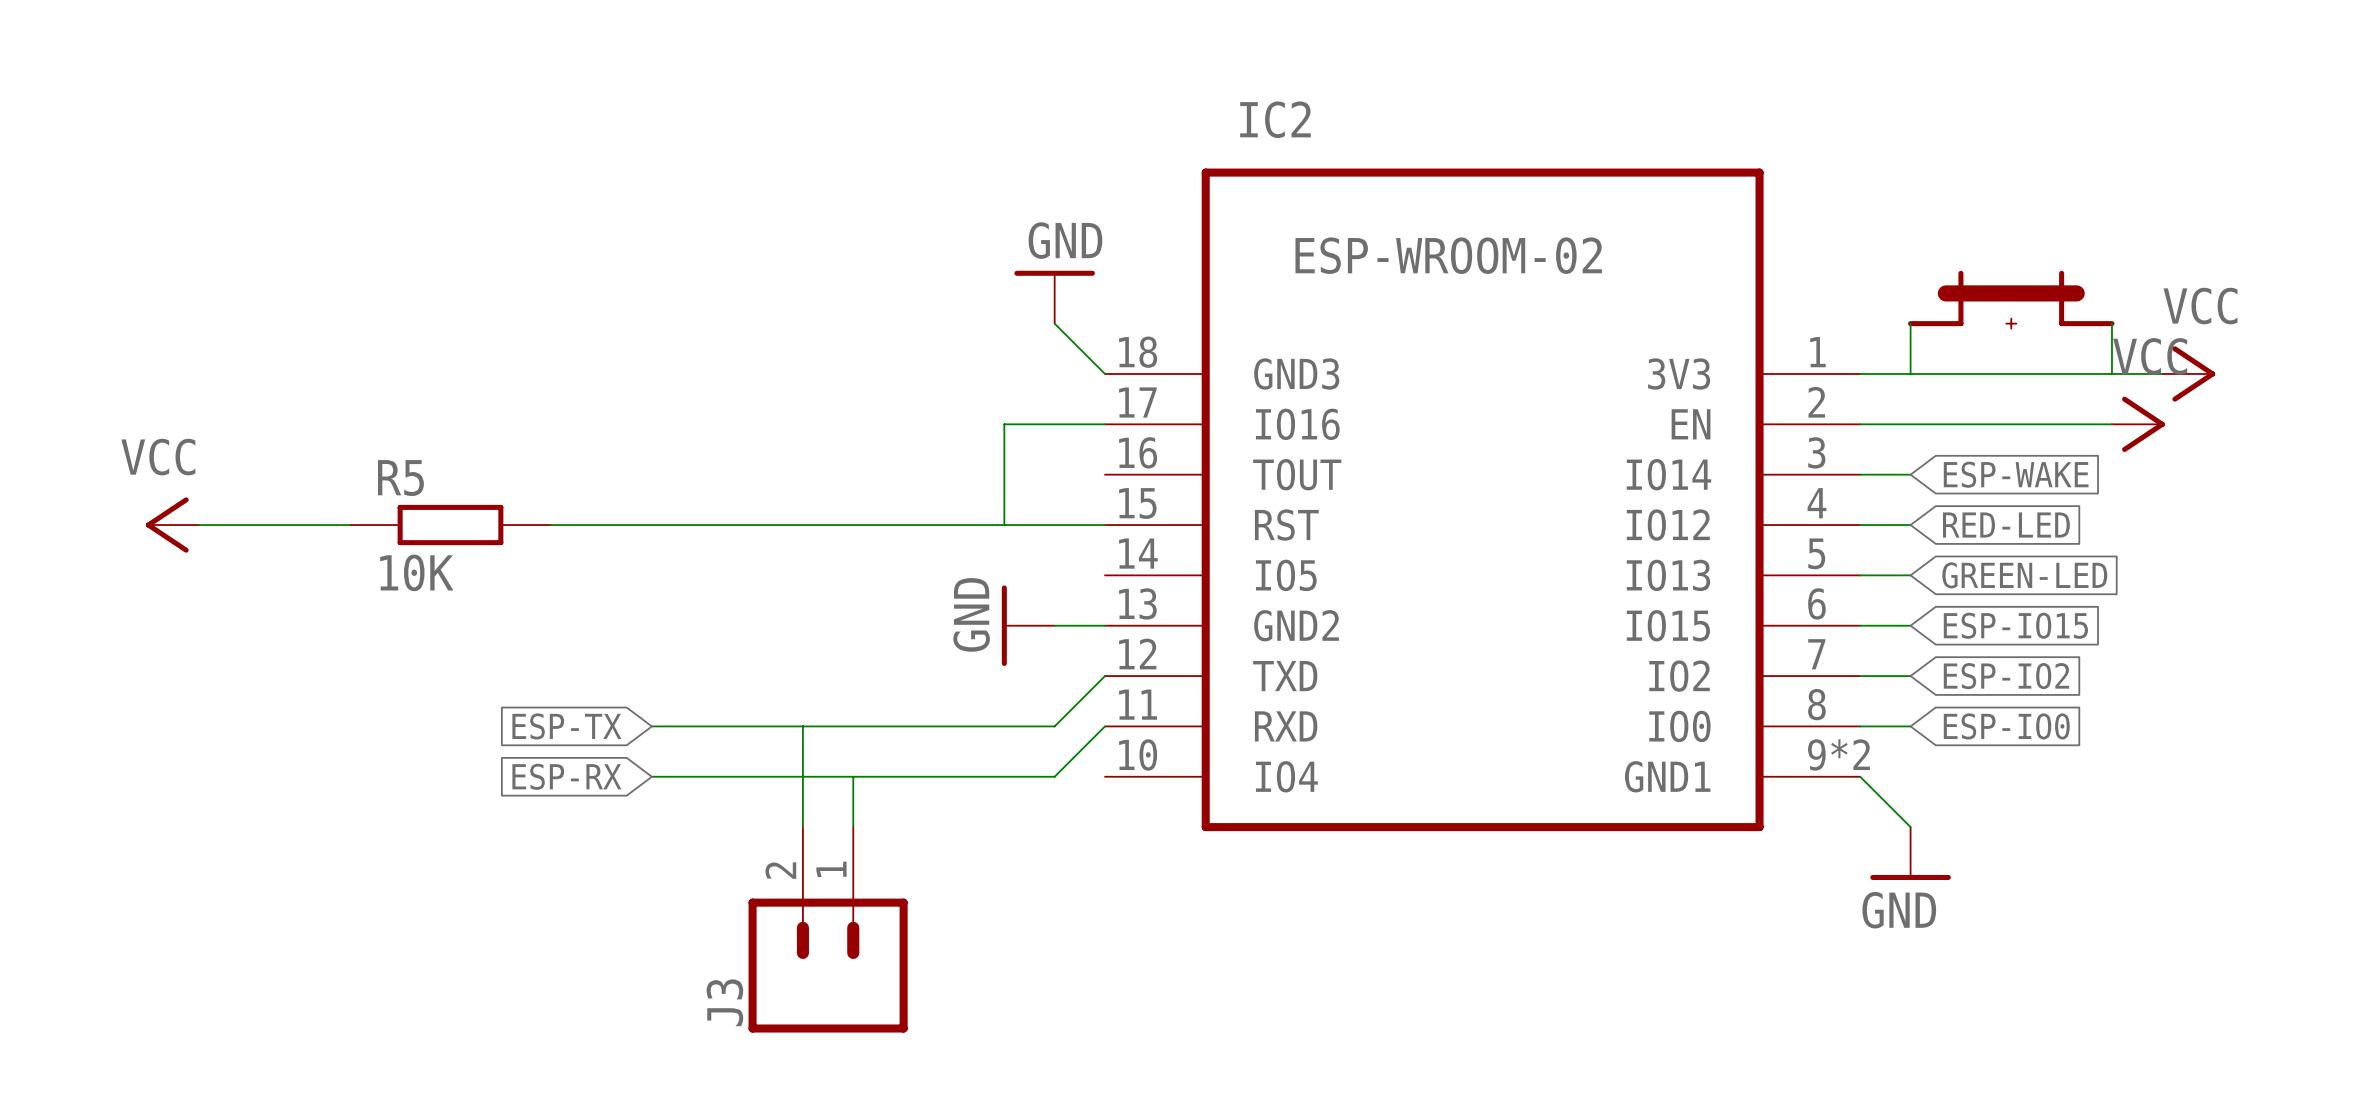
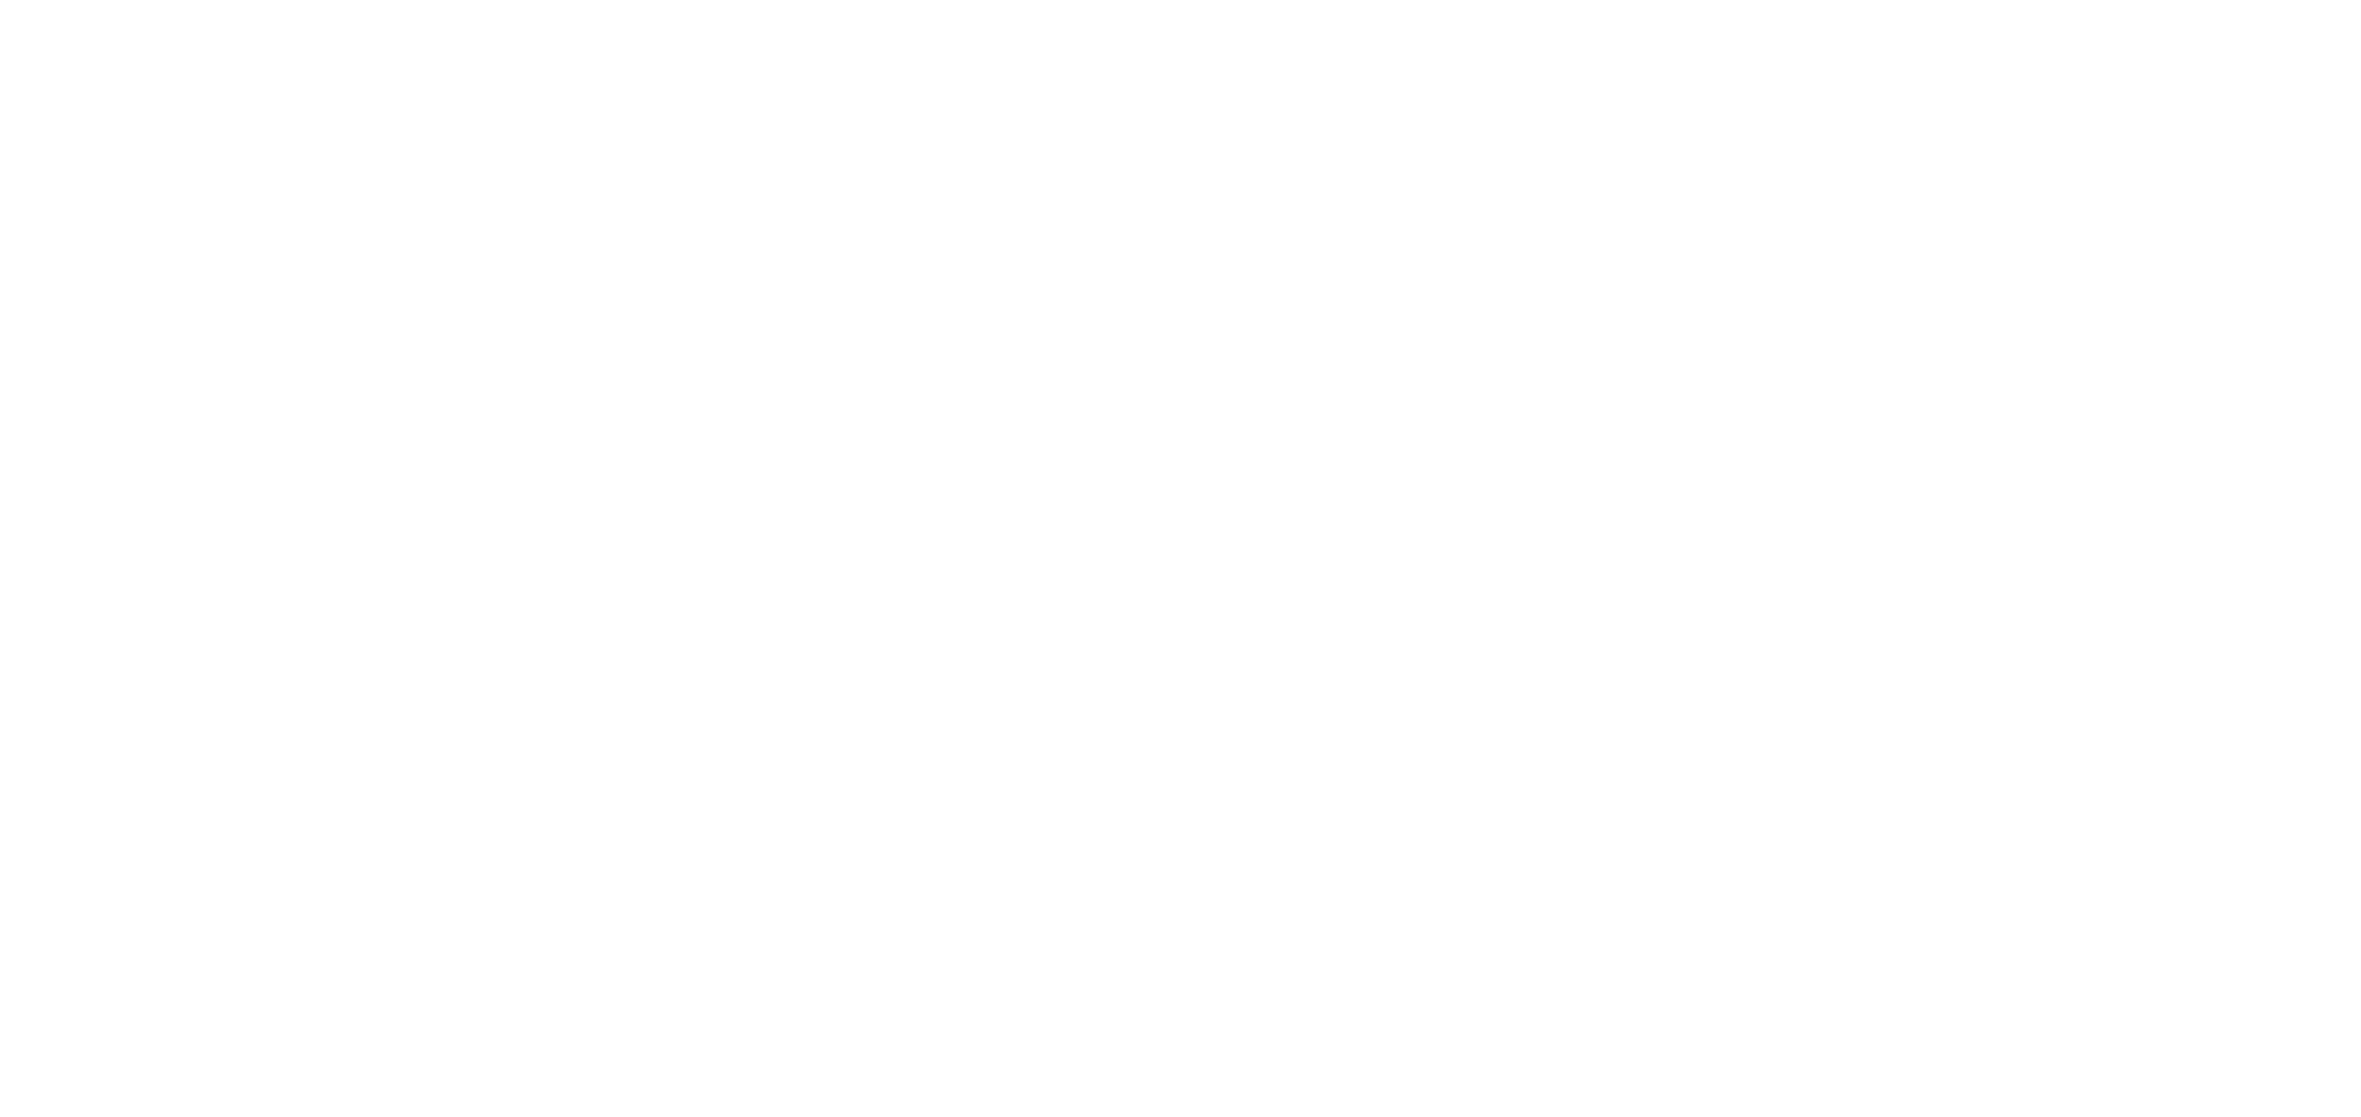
power symbol: GND (1054, 297) -> none
part: (2011, 300) -> none
wire: (1054, 323) (1105, 373) -> none
wire: (1910, 323) (1910, 373) -> none
wire: (2111, 323) (2111, 373) -> none
wire: (1860, 373) (2162, 373) -> none
power symbol: VCC (2188, 373) -> none
wire: (1105, 424) (1004, 424) (1004, 525) -> none
wire: (1860, 424) (2111, 424) -> none
power symbol: VCC (2138, 424) -> none
wire: (1860, 474) (1910, 474) -> none
global label: ESP-WAKE (2016, 474) -> none
IC2: ESP-WROOM-02 (1482, 499) -> none
power symbol: VCC (172, 525) -> none
wire: (198, 525) (349, 525) -> none
R5: 10K (450, 525) -> none
wire: (551, 525) (1105, 525) -> none
wire: (1860, 525) (1910, 525) -> none
global label: RED-LED (2006, 525) -> none
wire: (1860, 575) (1910, 575) -> none
global label: GREEN-LED (2024, 575) -> none
power symbol: GND (1028, 625) -> none
wire: (1054, 625) (1105, 625) -> none
wire: (1860, 625) (1910, 625) -> none
global label: ESP-IO15 (2015, 625) -> none
wire: (1105, 676) (1054, 726) (651, 726) -> none
wire: (1860, 676) (1910, 676) -> none
global label: ESP-IO2 (2006, 676) -> none
global label: ESP-TX (566, 726) -> none
wire: (802, 726) (802, 827) -> none
wire: (1105, 726) (1054, 776) (651, 776) -> none
wire: (1860, 726) (1910, 726) -> none
global label: ESP-IO0 (2006, 726) -> none
global label: ESP-RX (566, 776) -> none
wire: (853, 776) (853, 827) -> none
wire: (1860, 776) (1910, 827) -> none
power symbol: GND (1910, 853) -> none
J3: (828, 929) -> none

